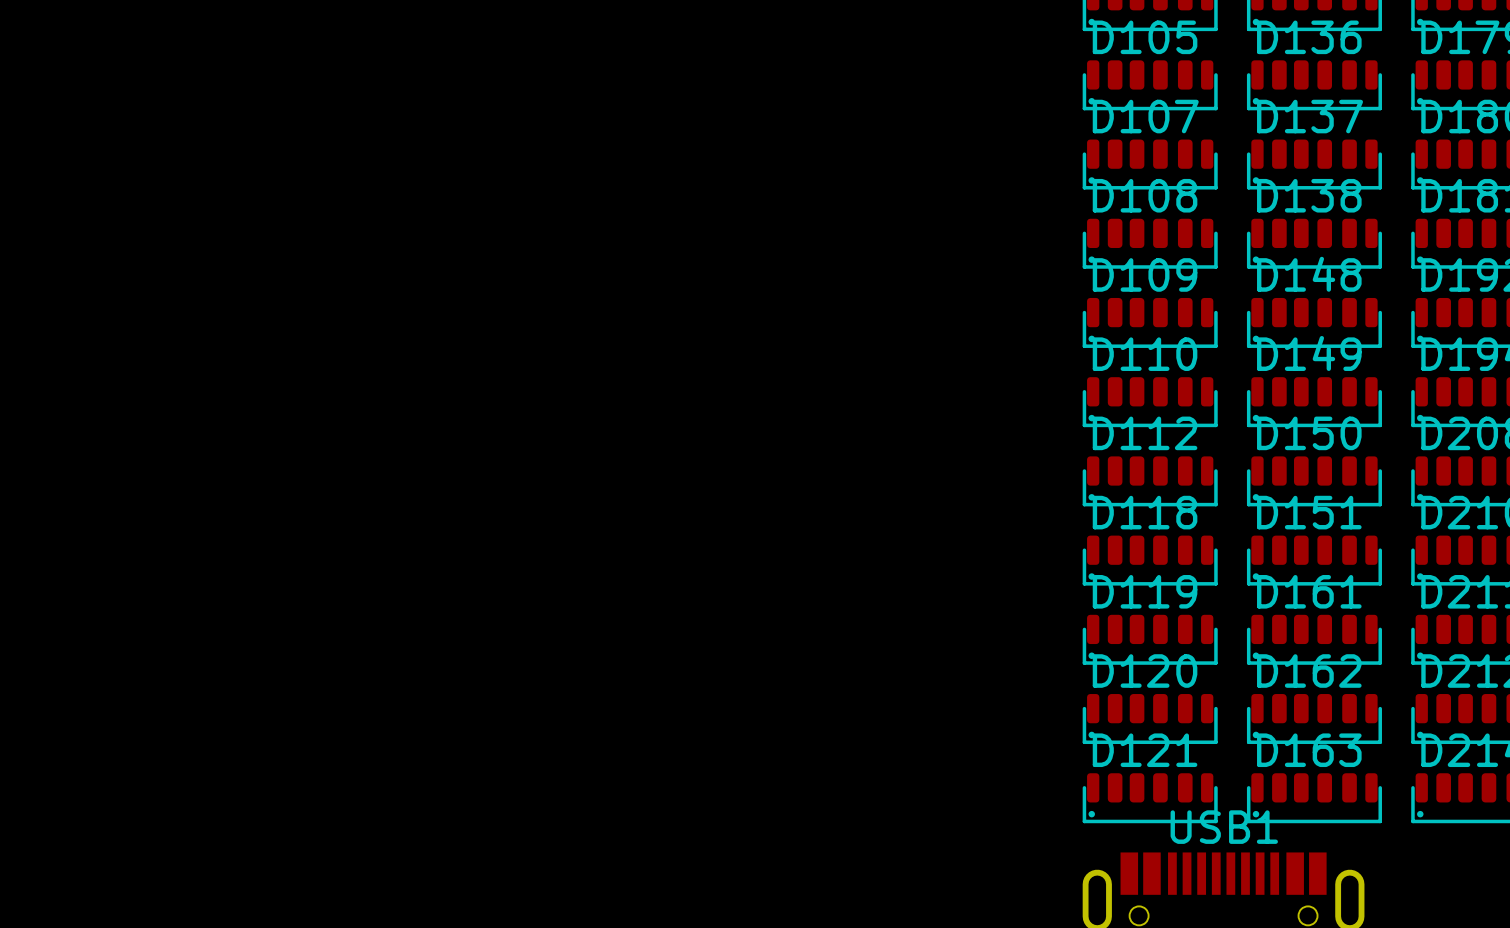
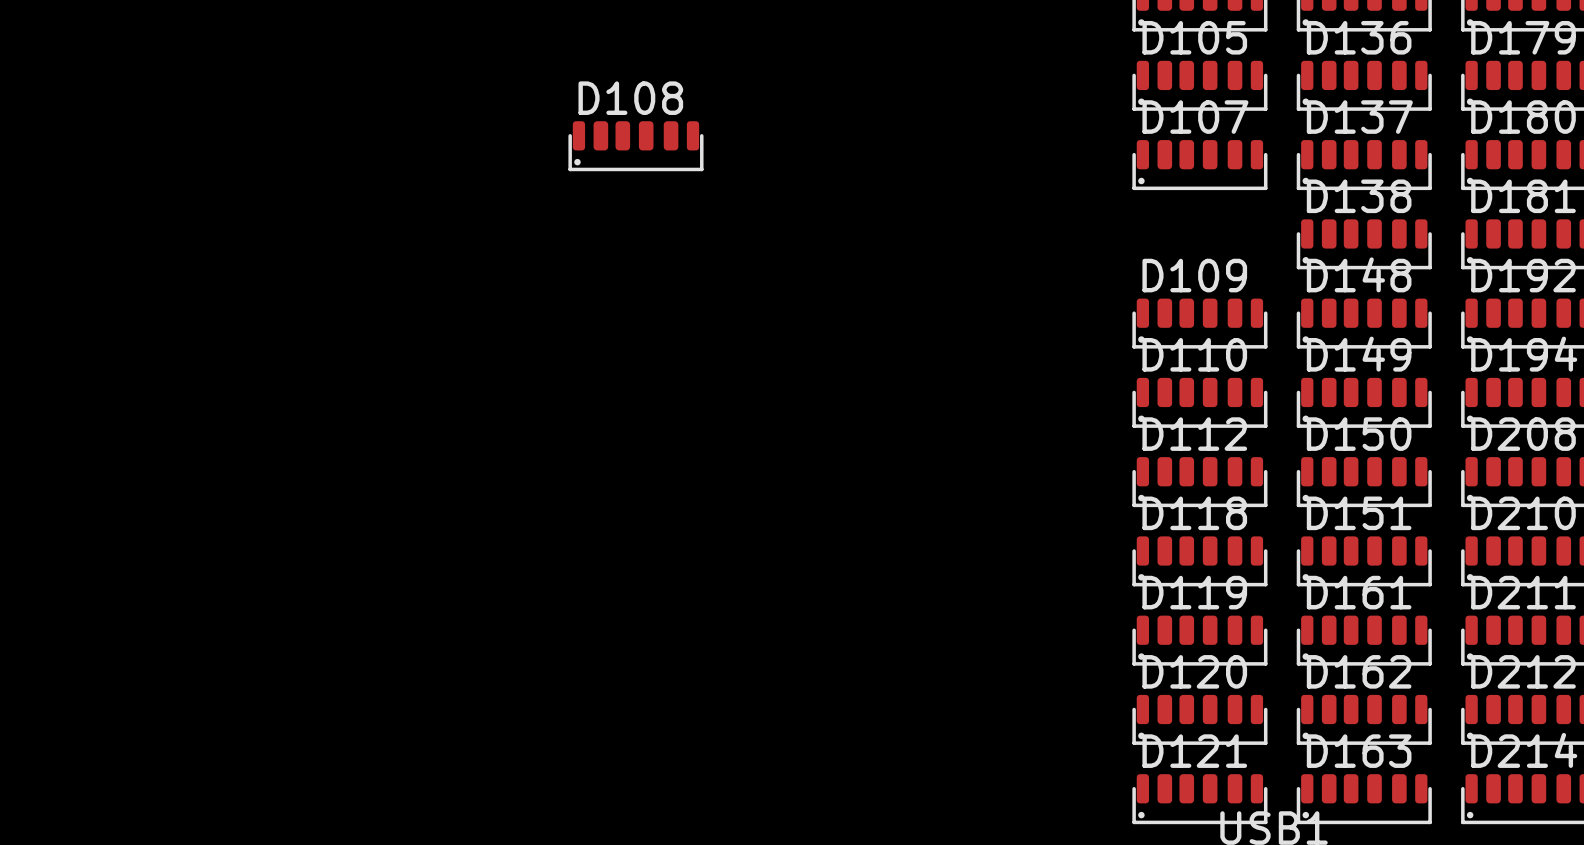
D108 position: (1150, 243) -> (635, 146)

